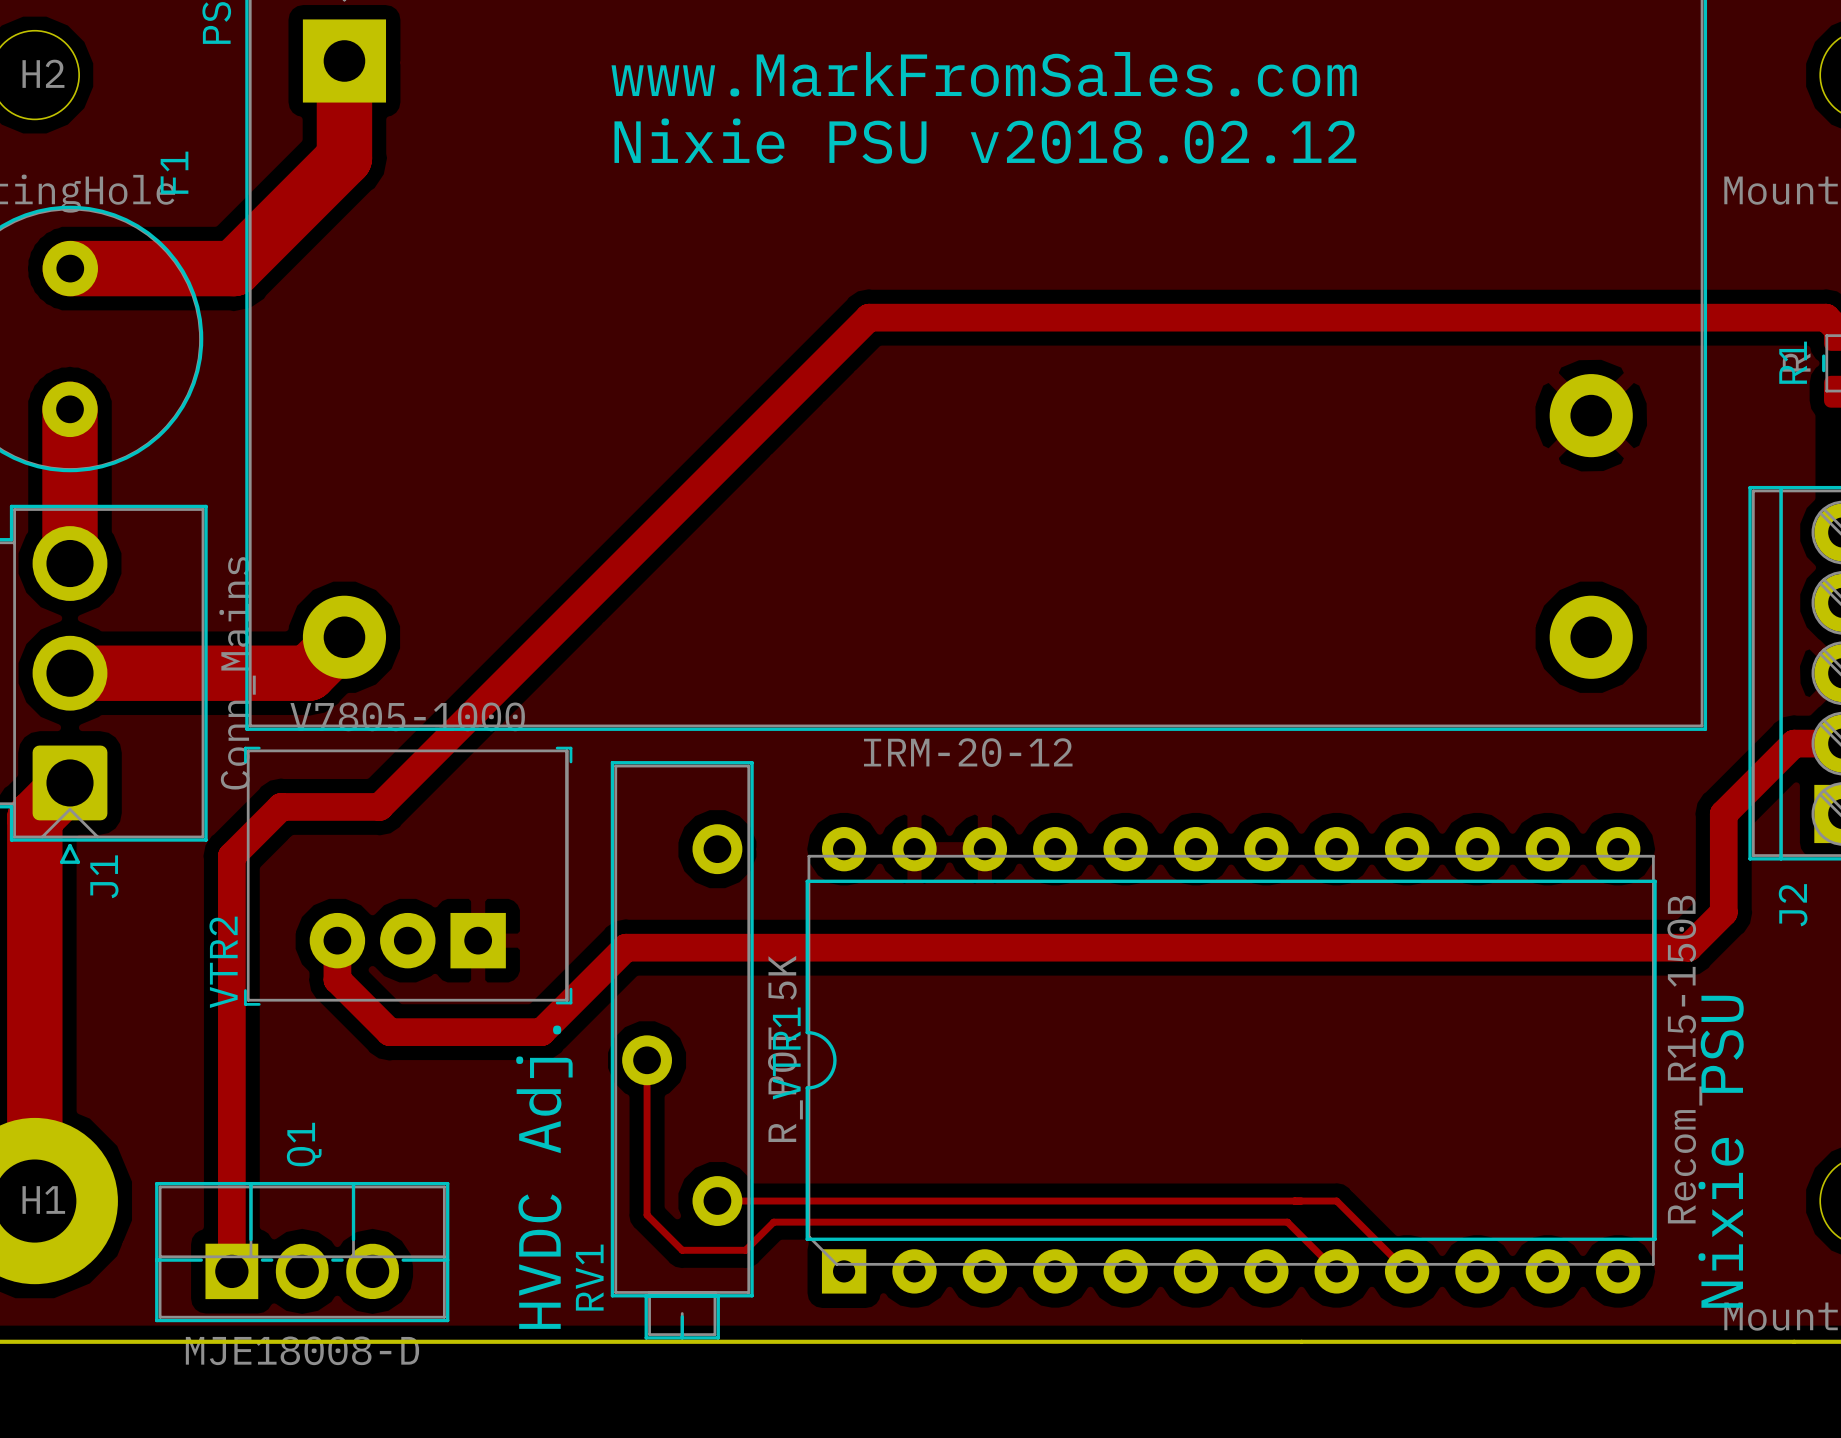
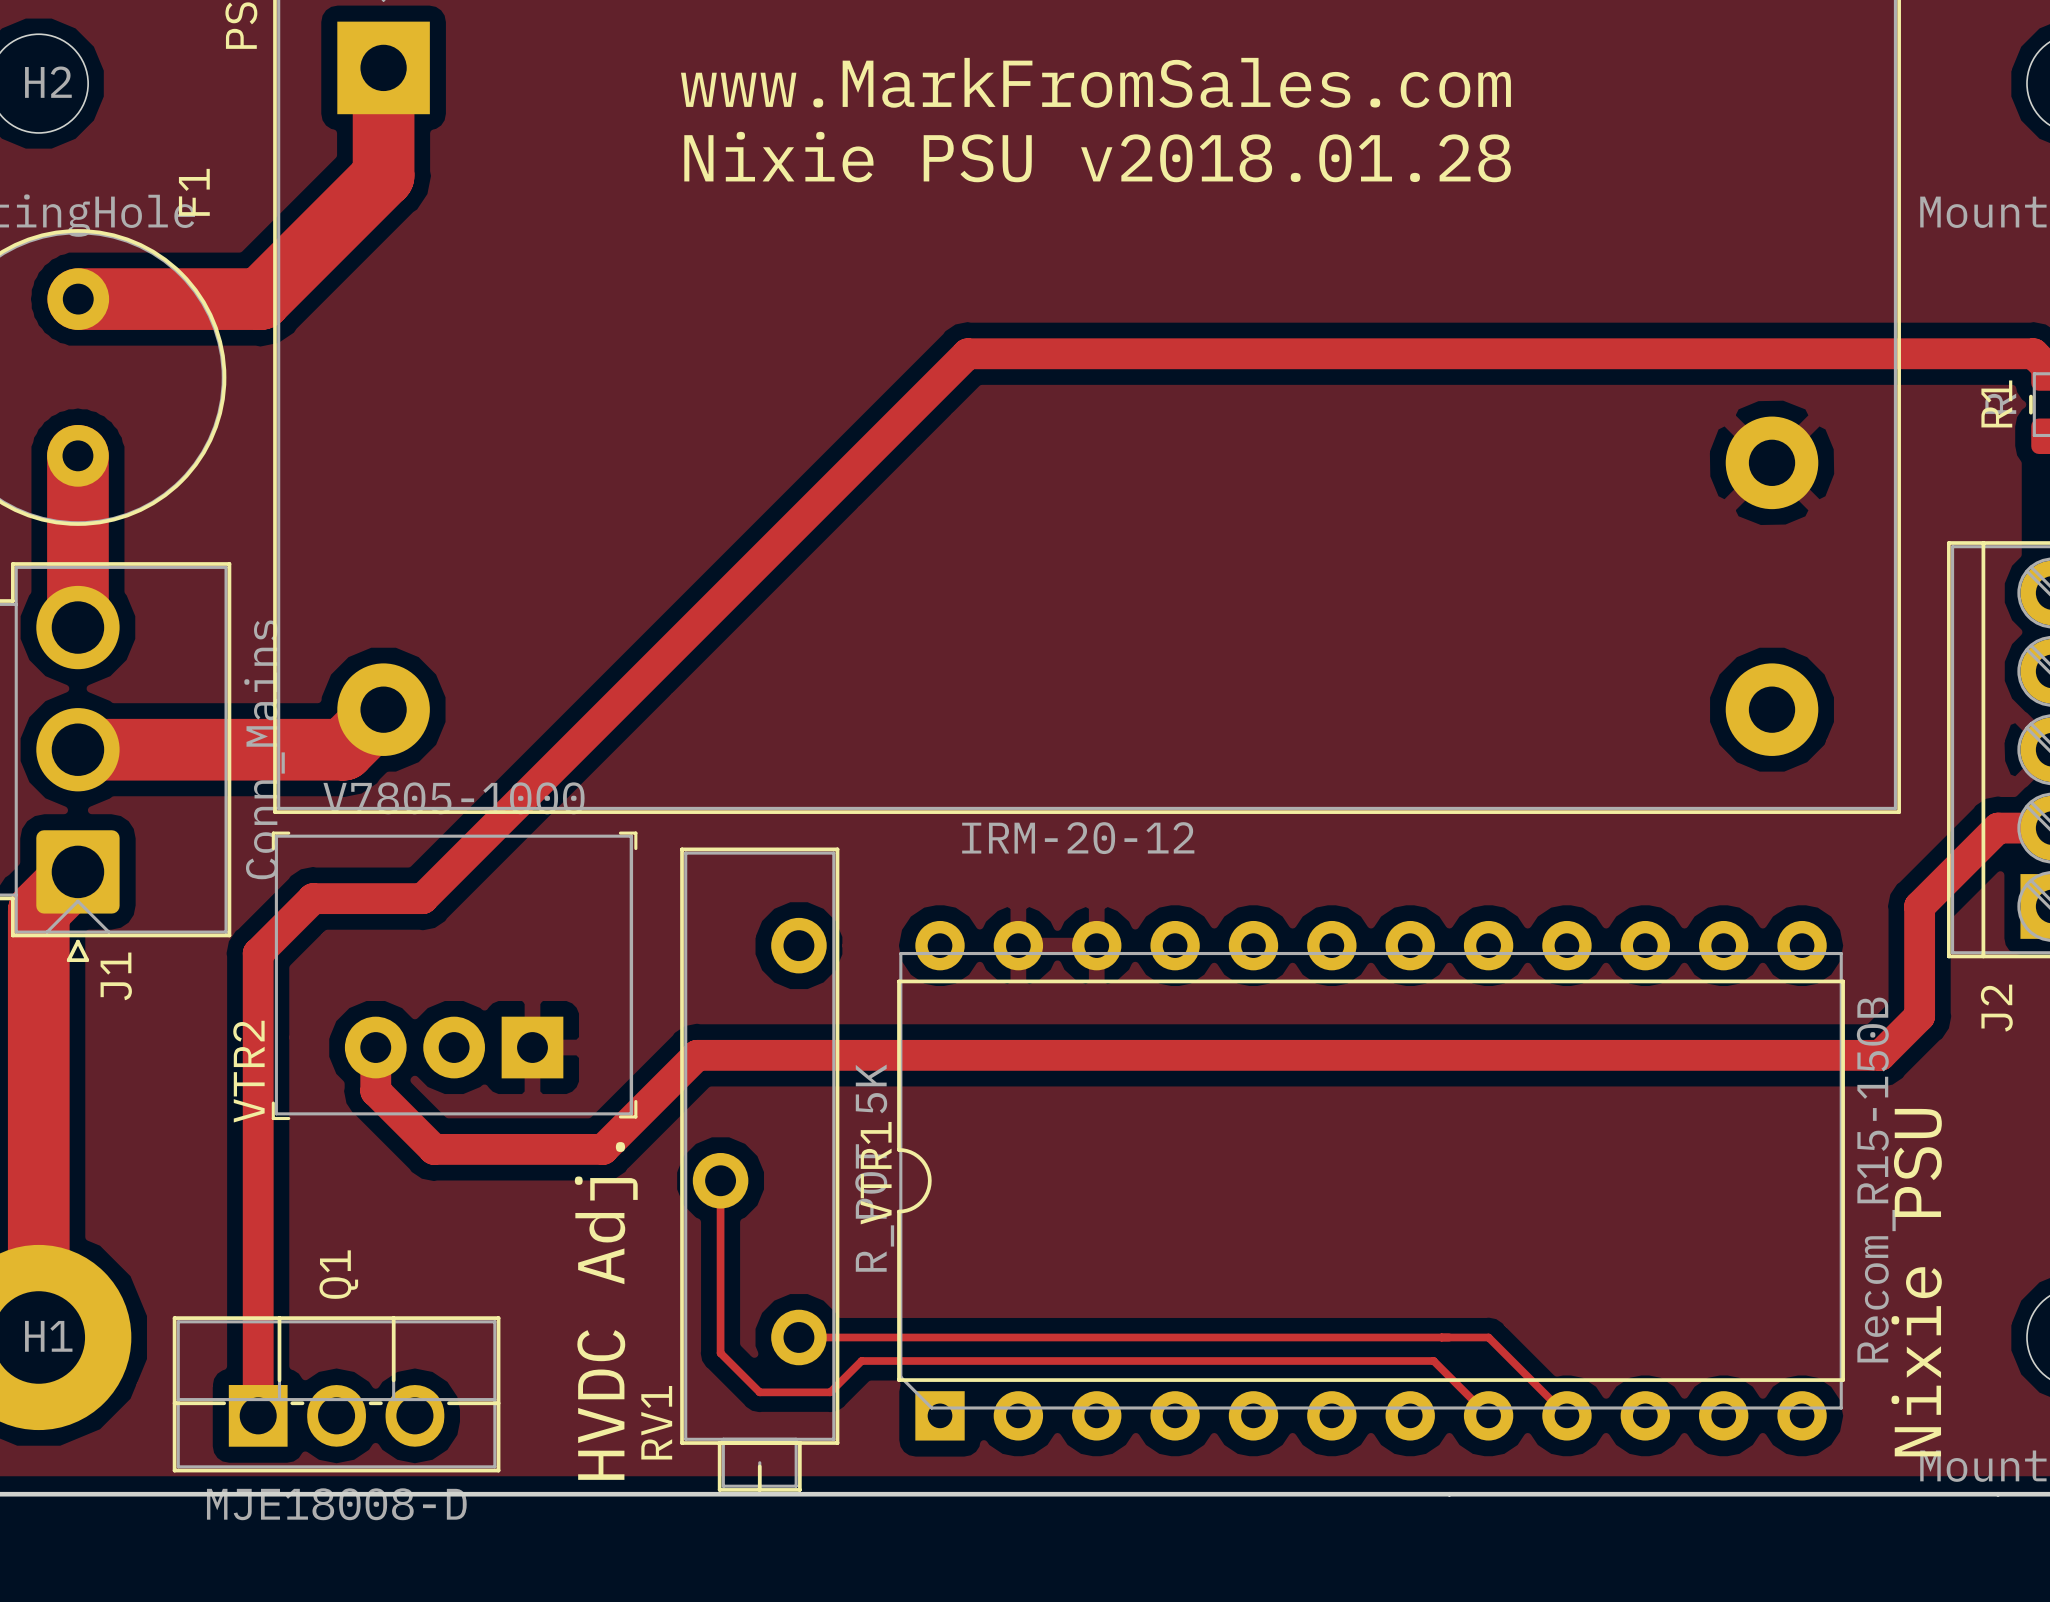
text: Nixie PSU v2018.02.12 (985, 141) -> Nixie PSU v2018.01.28 (1097, 157)

